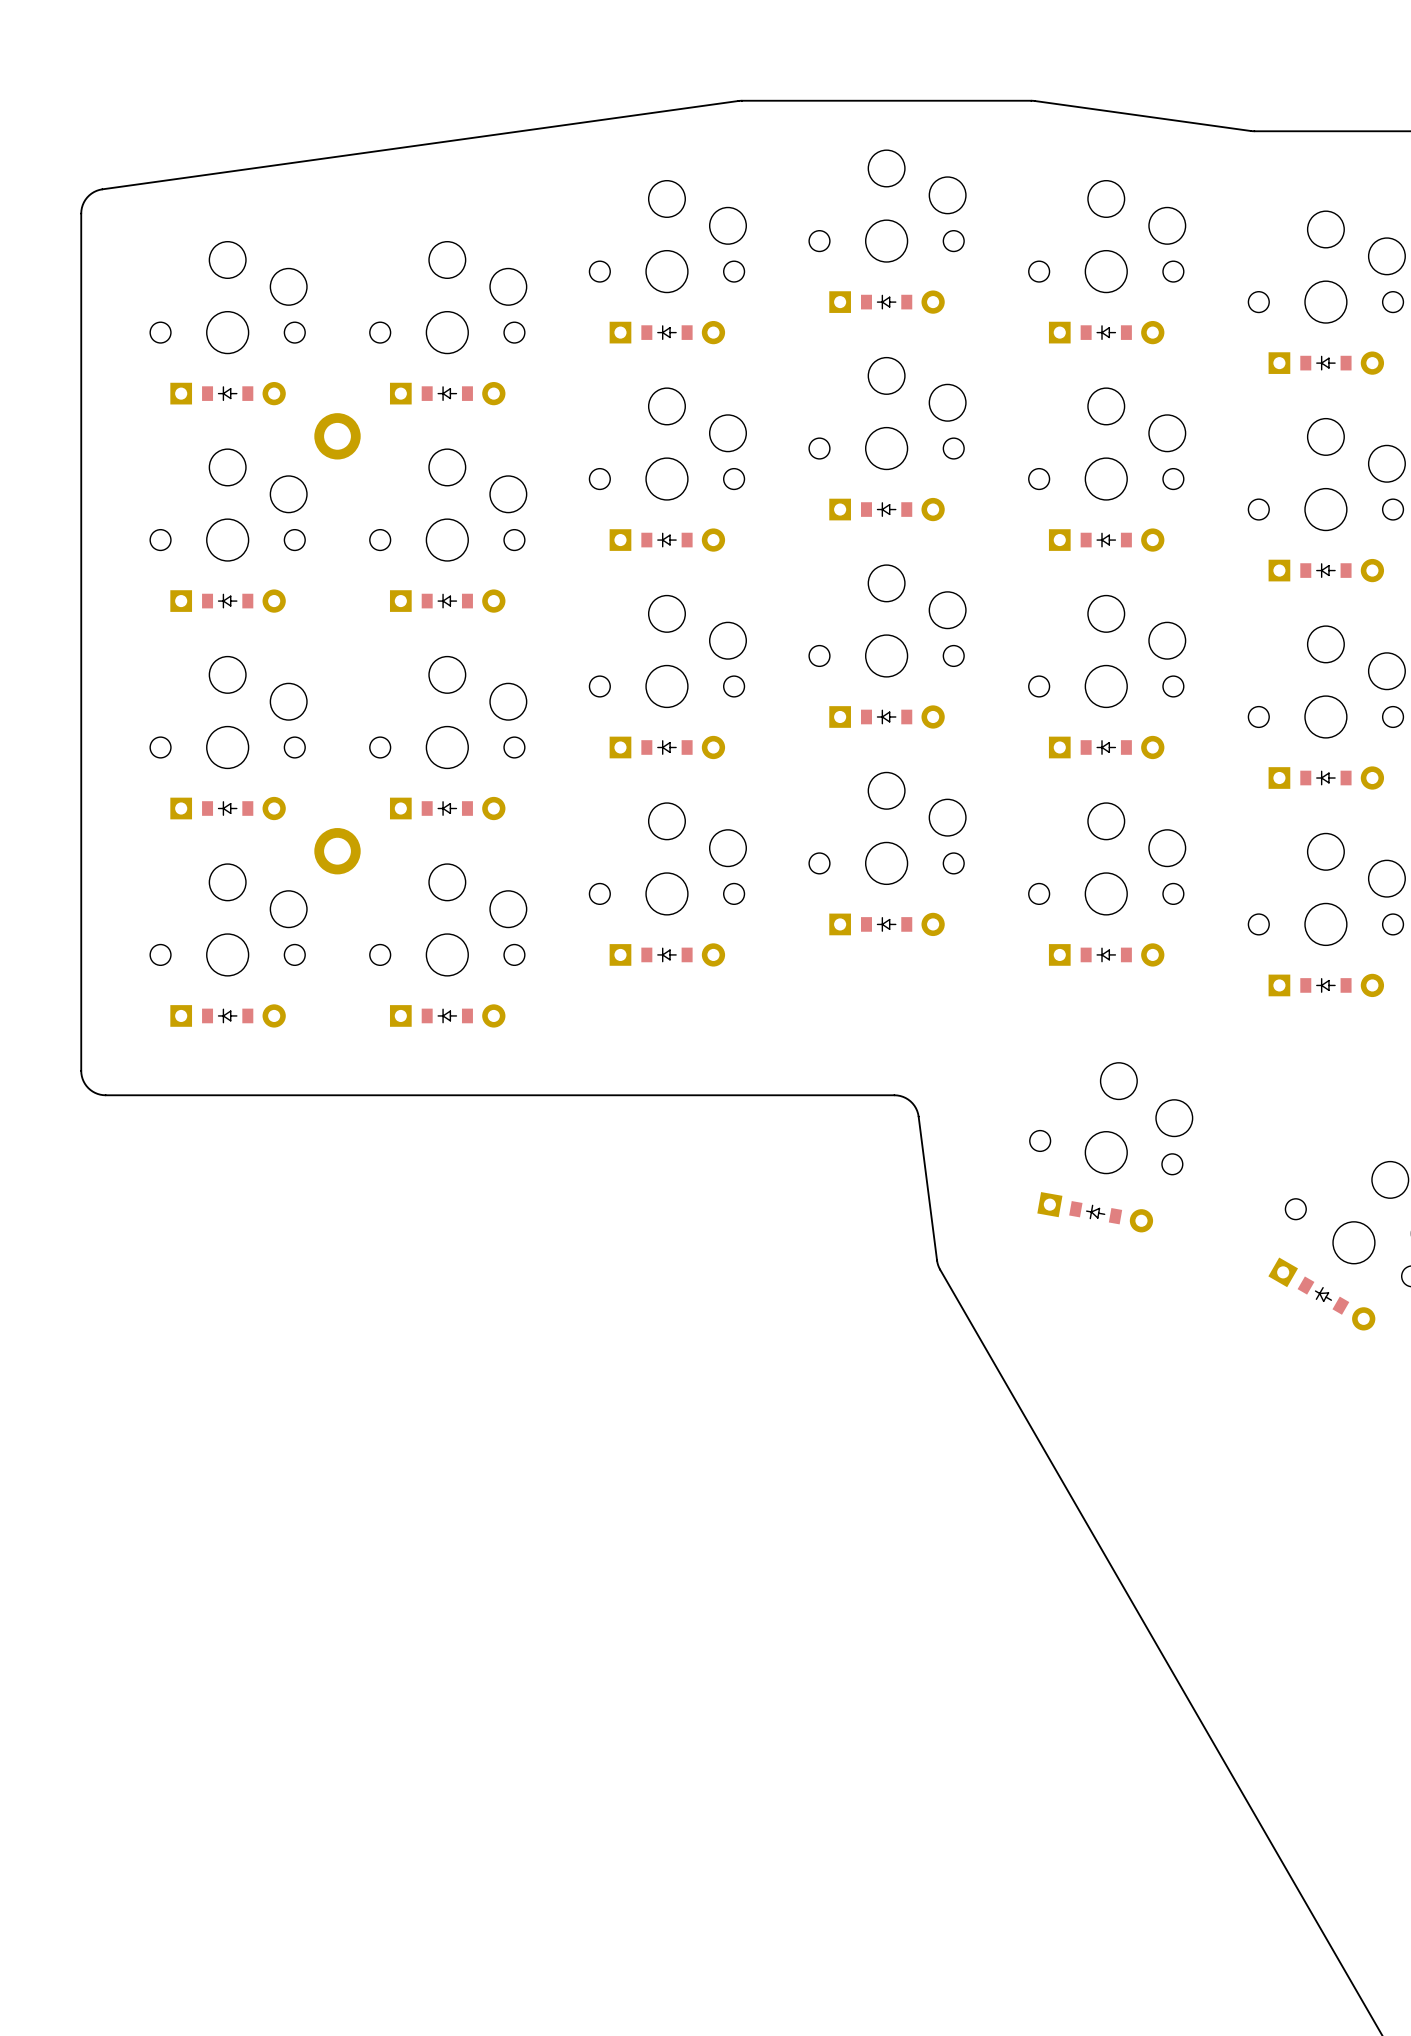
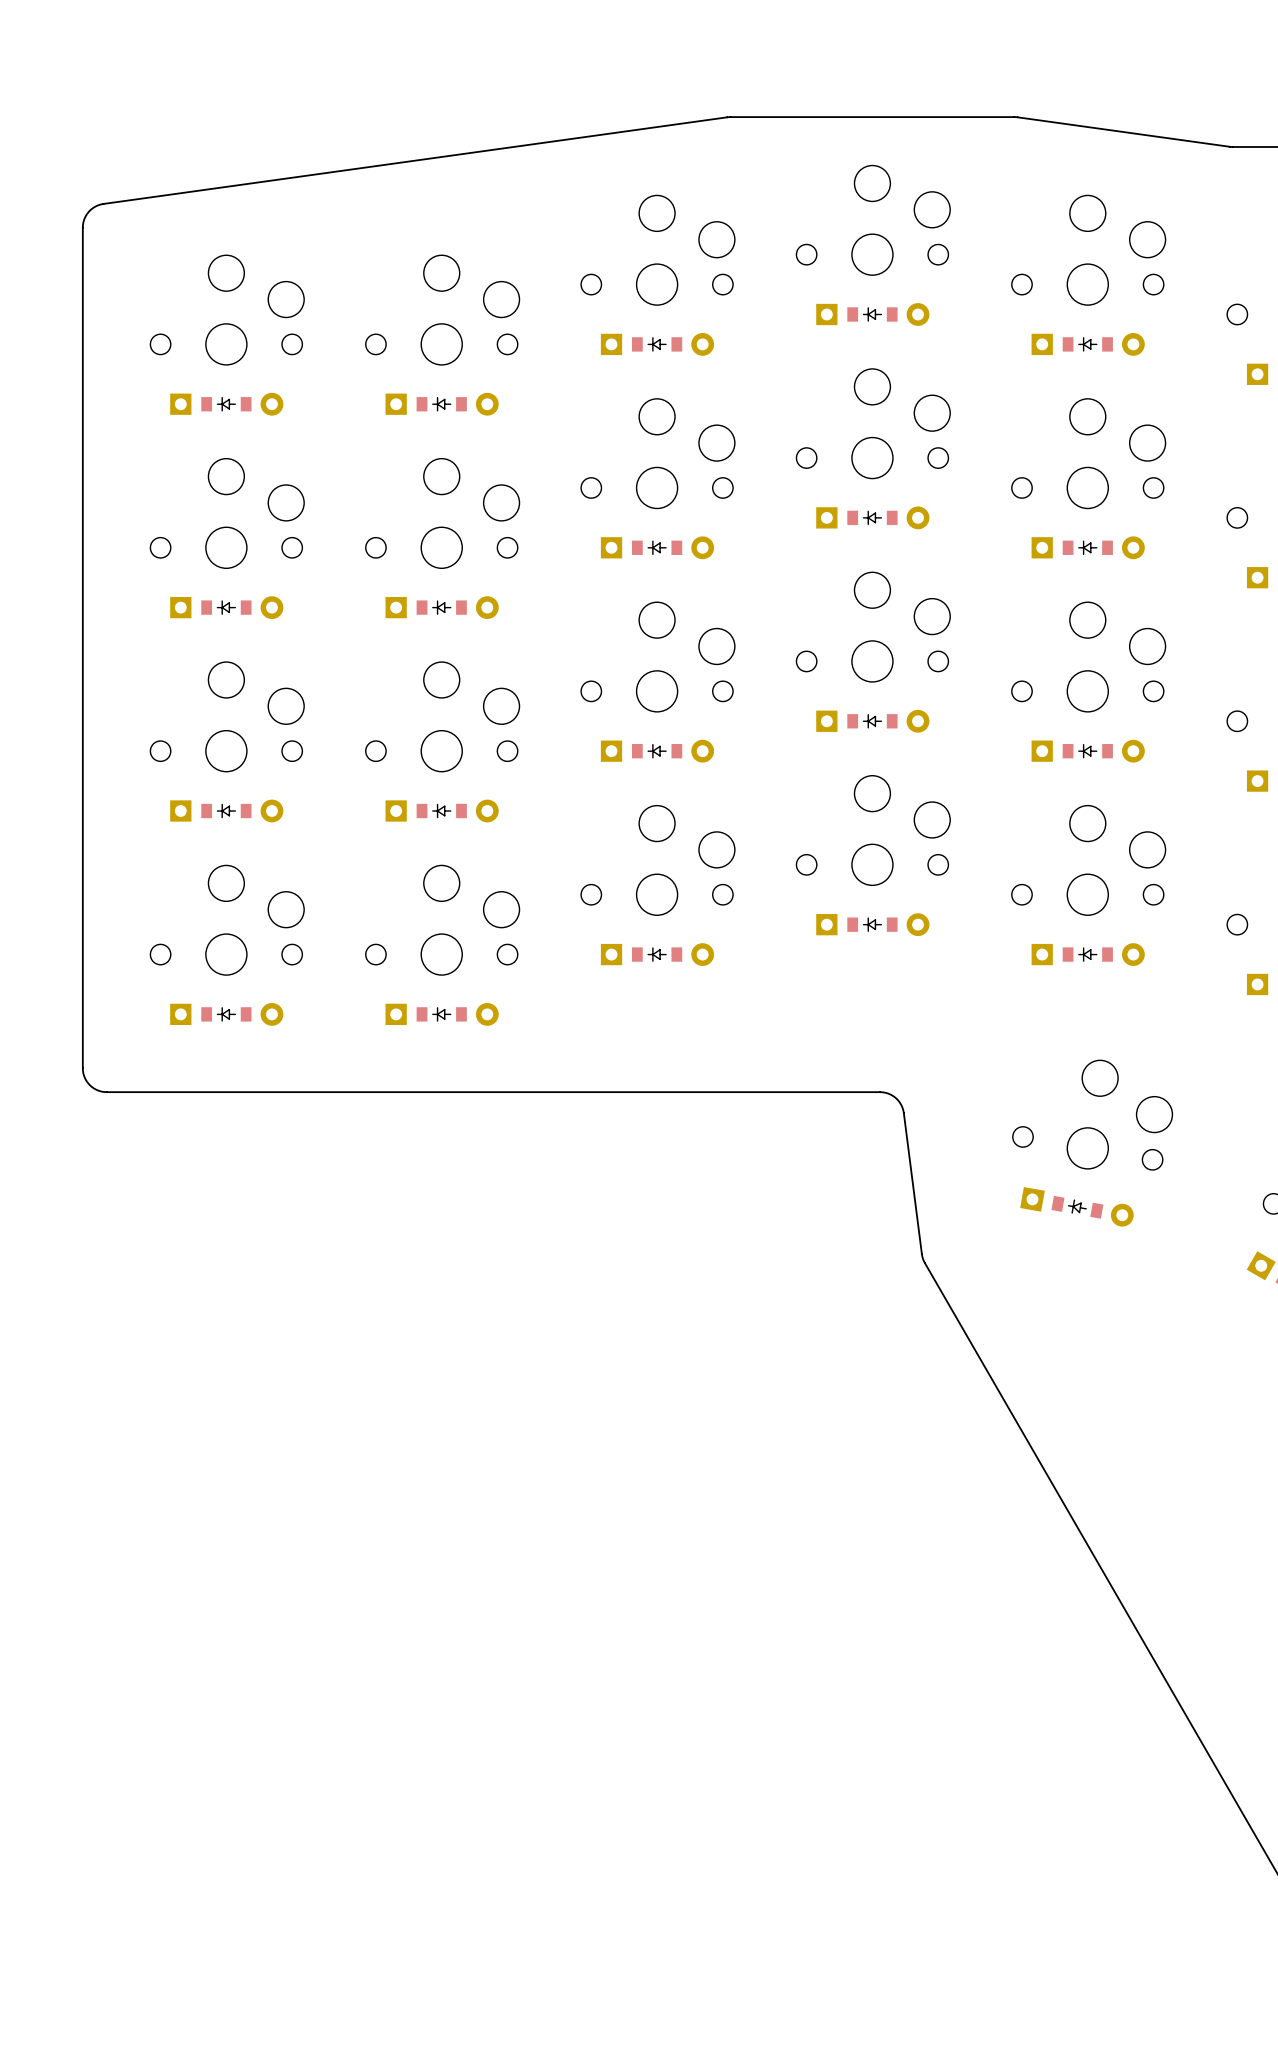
part: (337, 436) -> none
part: (337, 851) -> none

